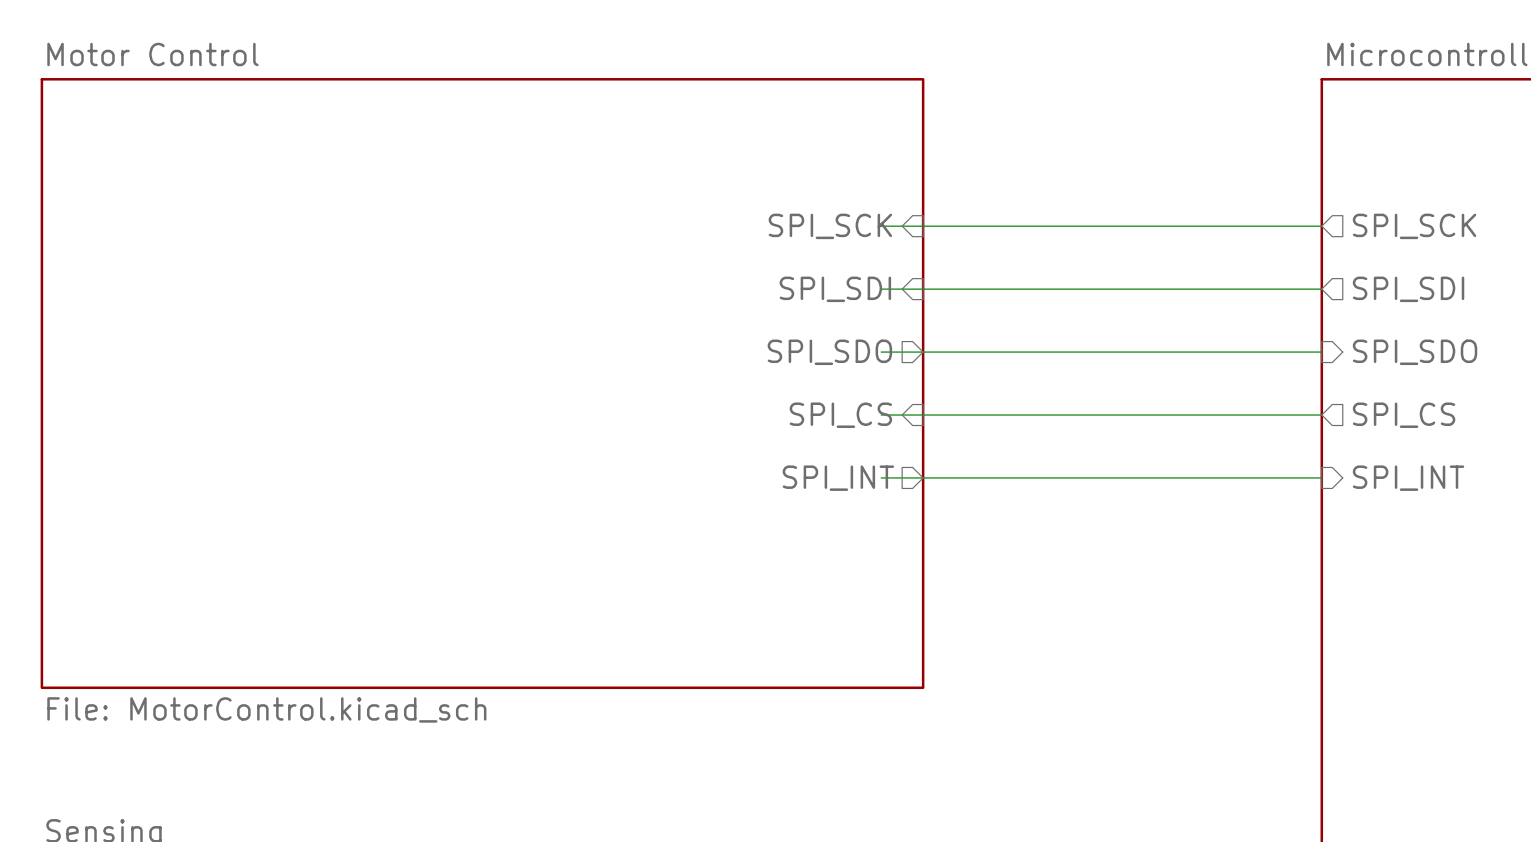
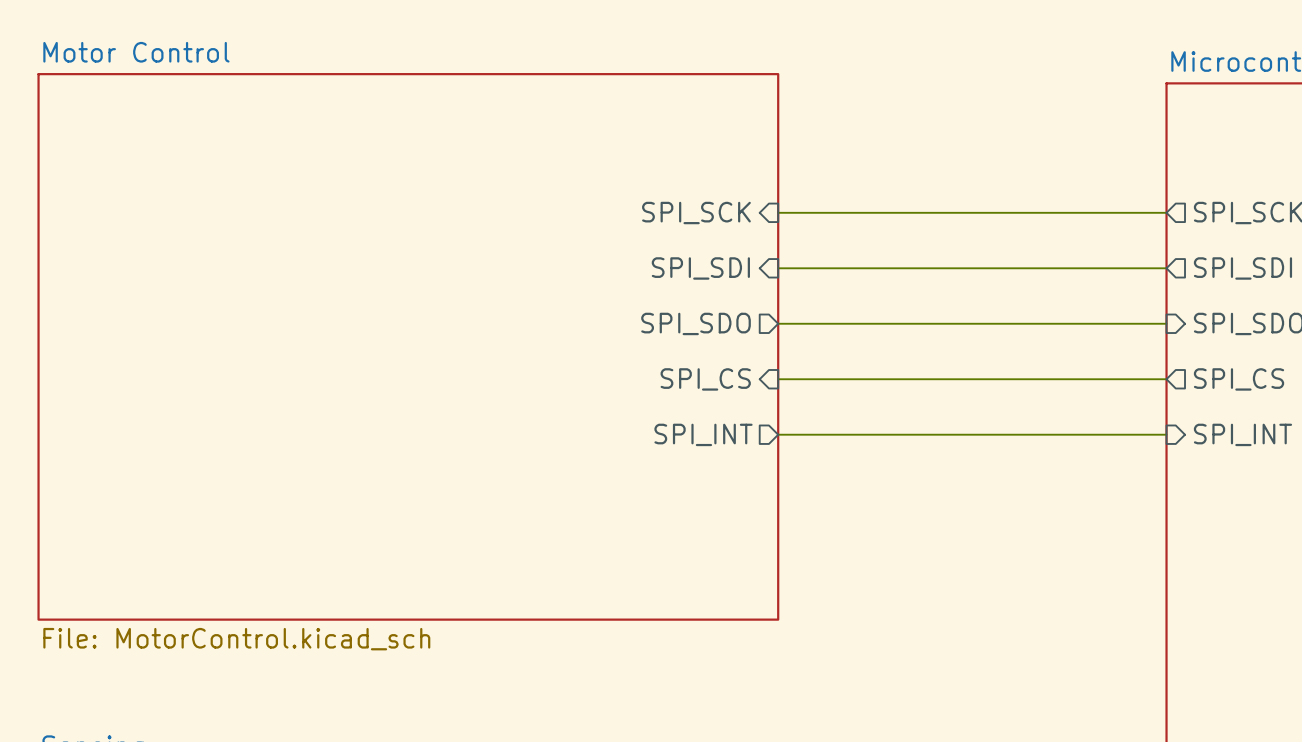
sheet pin position: SPI_SCK (830, 226) -> SPI_SCK (696, 213)
sheet pin position: SPI_SDI (835, 289) -> SPI_SDI (700, 268)
sheet pin position: SPI_SDO (829, 352) -> SPI_SDO (696, 323)
sheet Motor Control: none -> File: MotorControl.kicad_sch (408, 346)
sheet Motor Control: File: MotorControl.kicad_sch (482, 383) -> none
sheet pin position: SPI_CS (840, 415) -> SPI_CS (705, 379)
sheet pin position: SPI_INT (838, 478) -> SPI_INT (703, 434)

